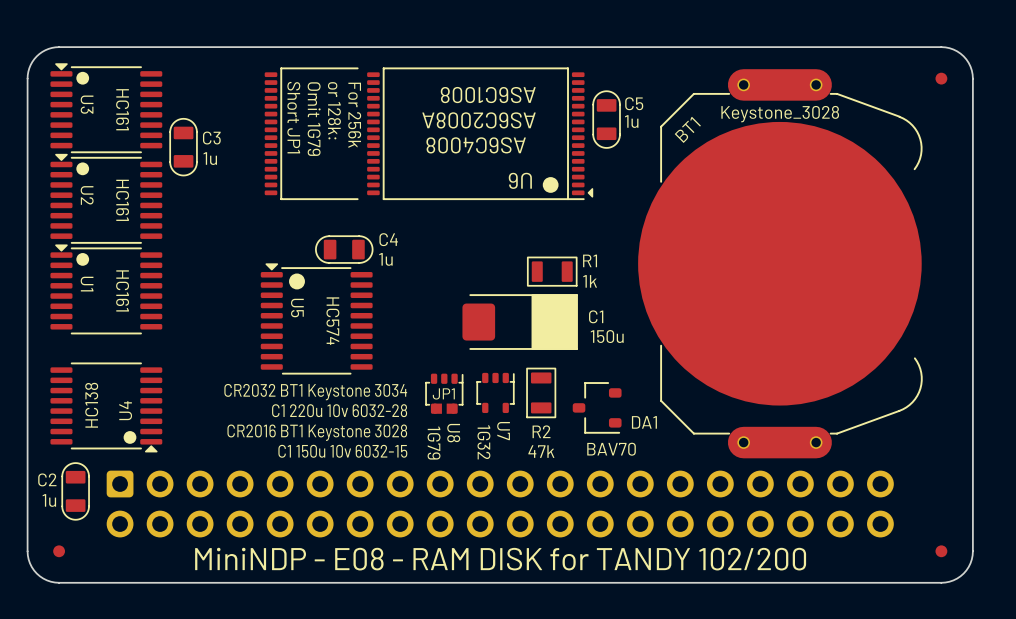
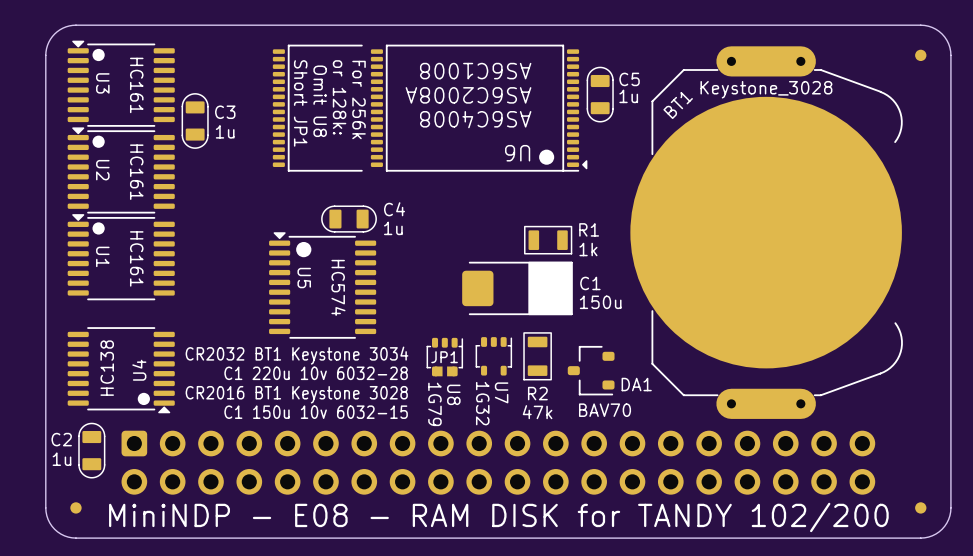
text: Omit 1G79 (314, 119) -> Omit U8 (320, 101)

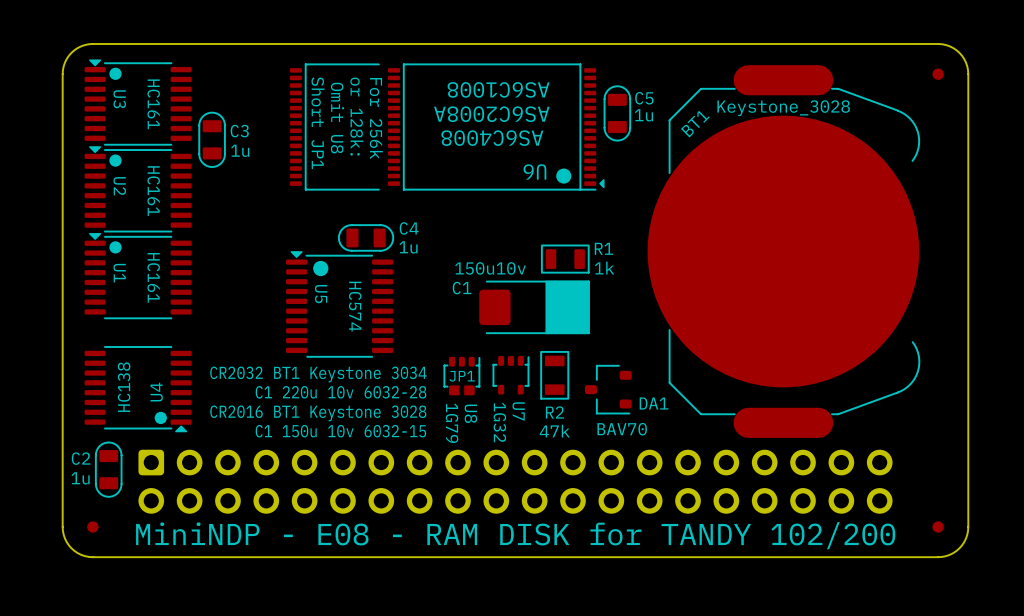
part: (731, 61) -> none
part: (800, 61) -> none
C1 name position: C1 (590, 283) -> C1 (462, 288)
C1 value: 150u (600, 302) -> 150u10v (490, 268)
part: (731, 403) -> none
part: (800, 403) -> none

